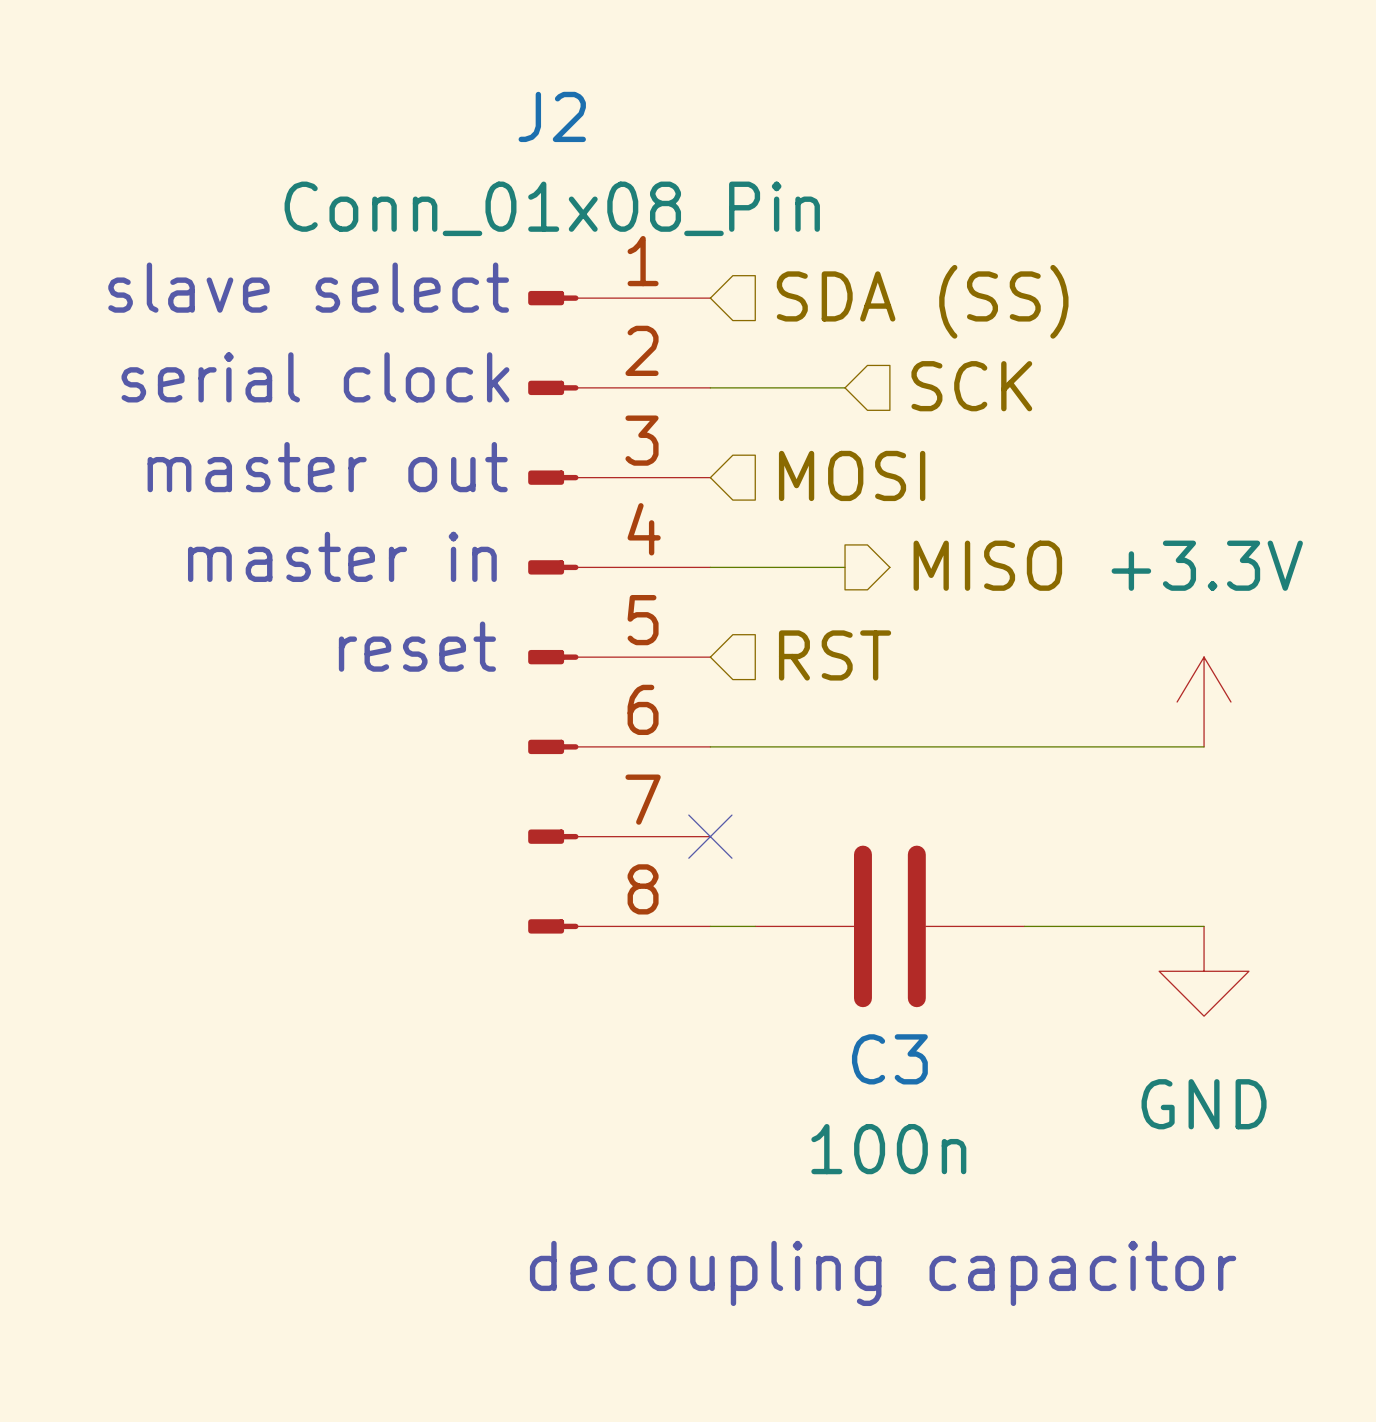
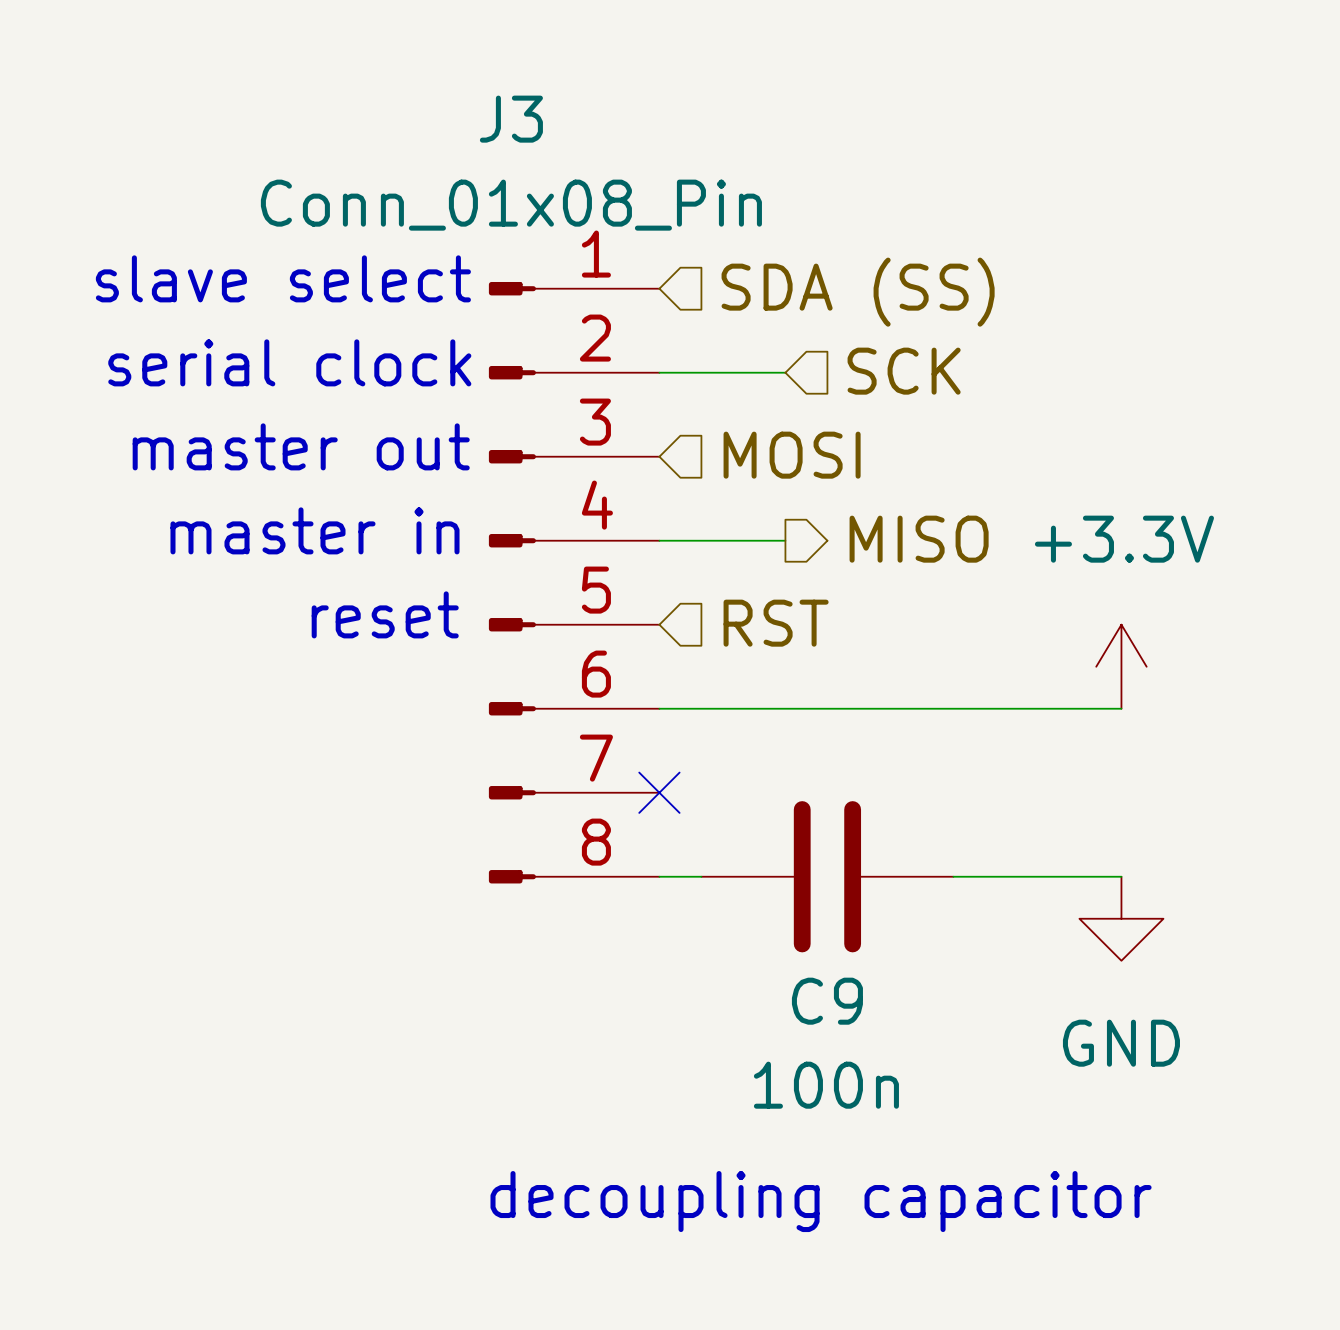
J2 name: J2 (552, 116) -> J3 (511, 119)
C3 name: C3 (889, 1059) -> C9 (827, 1001)

